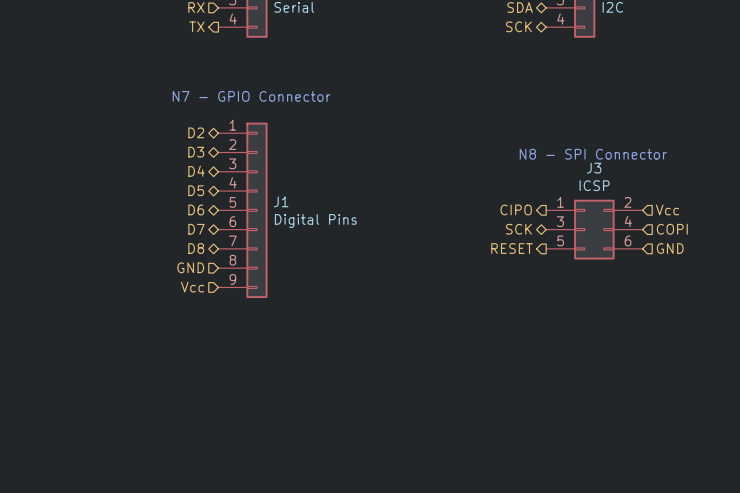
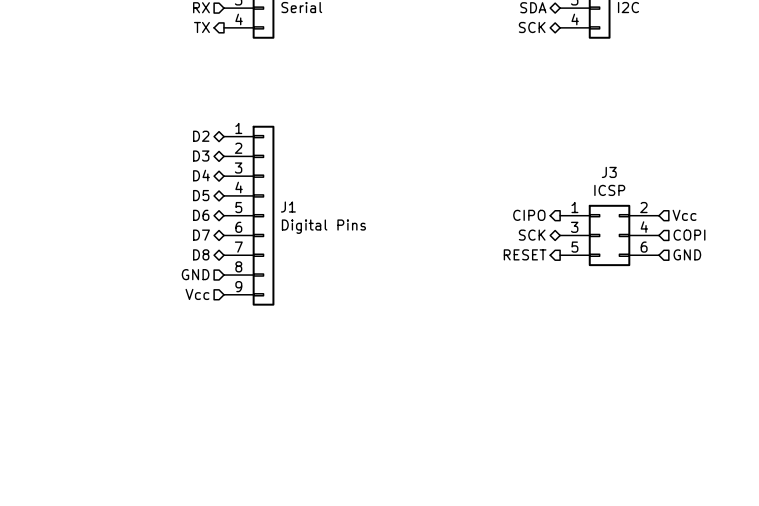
text: N7 - GPIO Connector (251, 96) -> none
text: N8 - SPI Connector (593, 154) -> none

